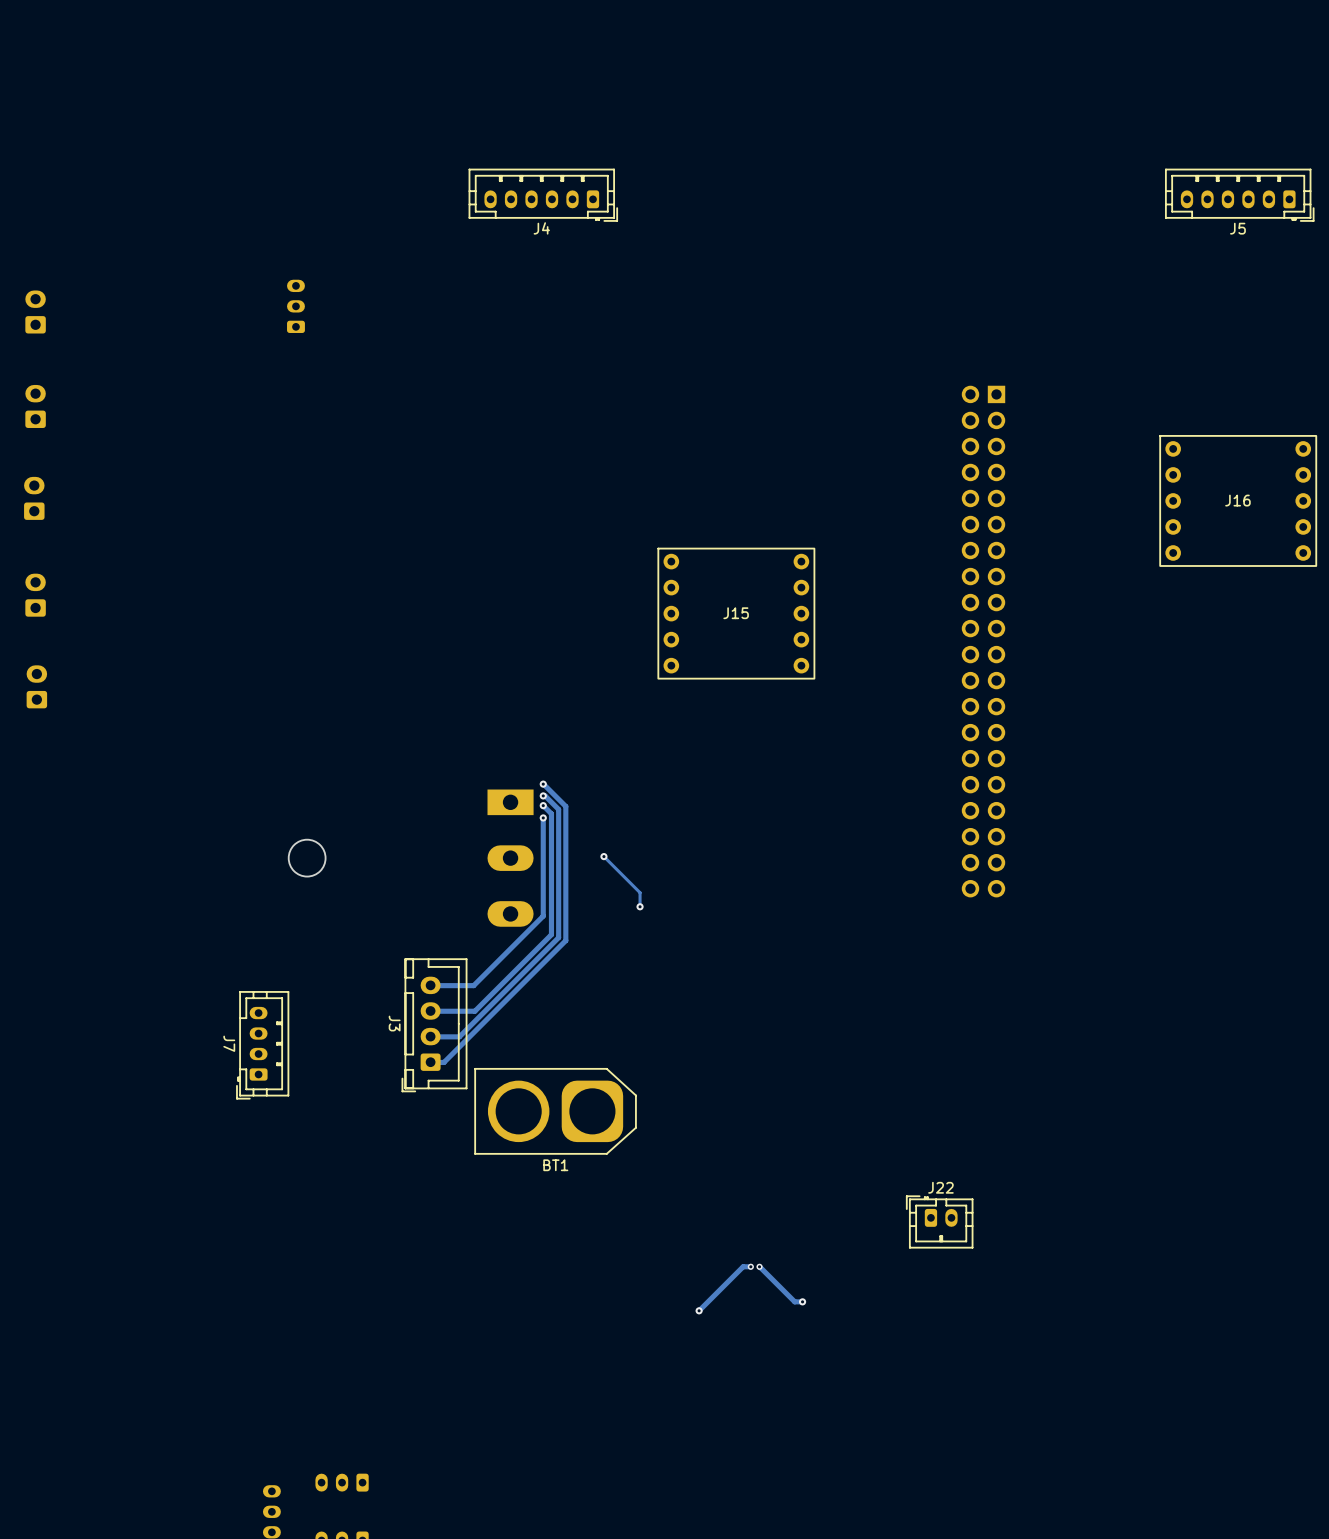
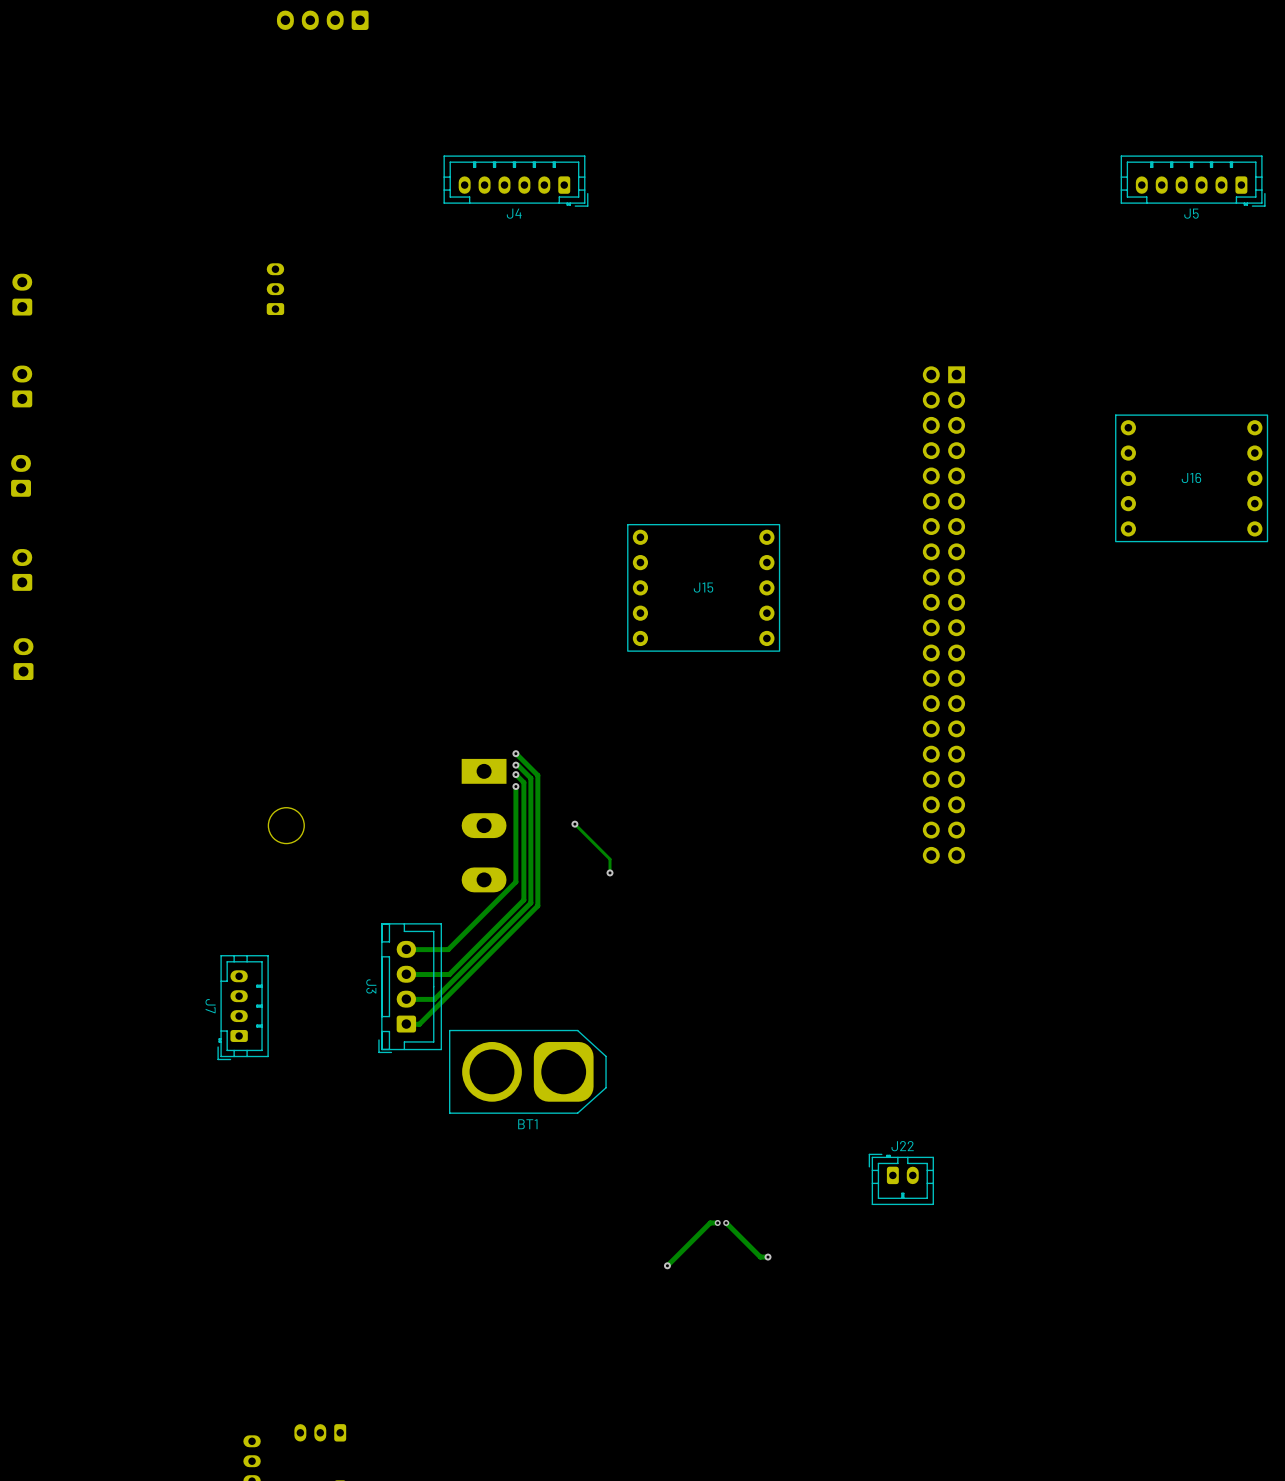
part: none -> (322, 20)

